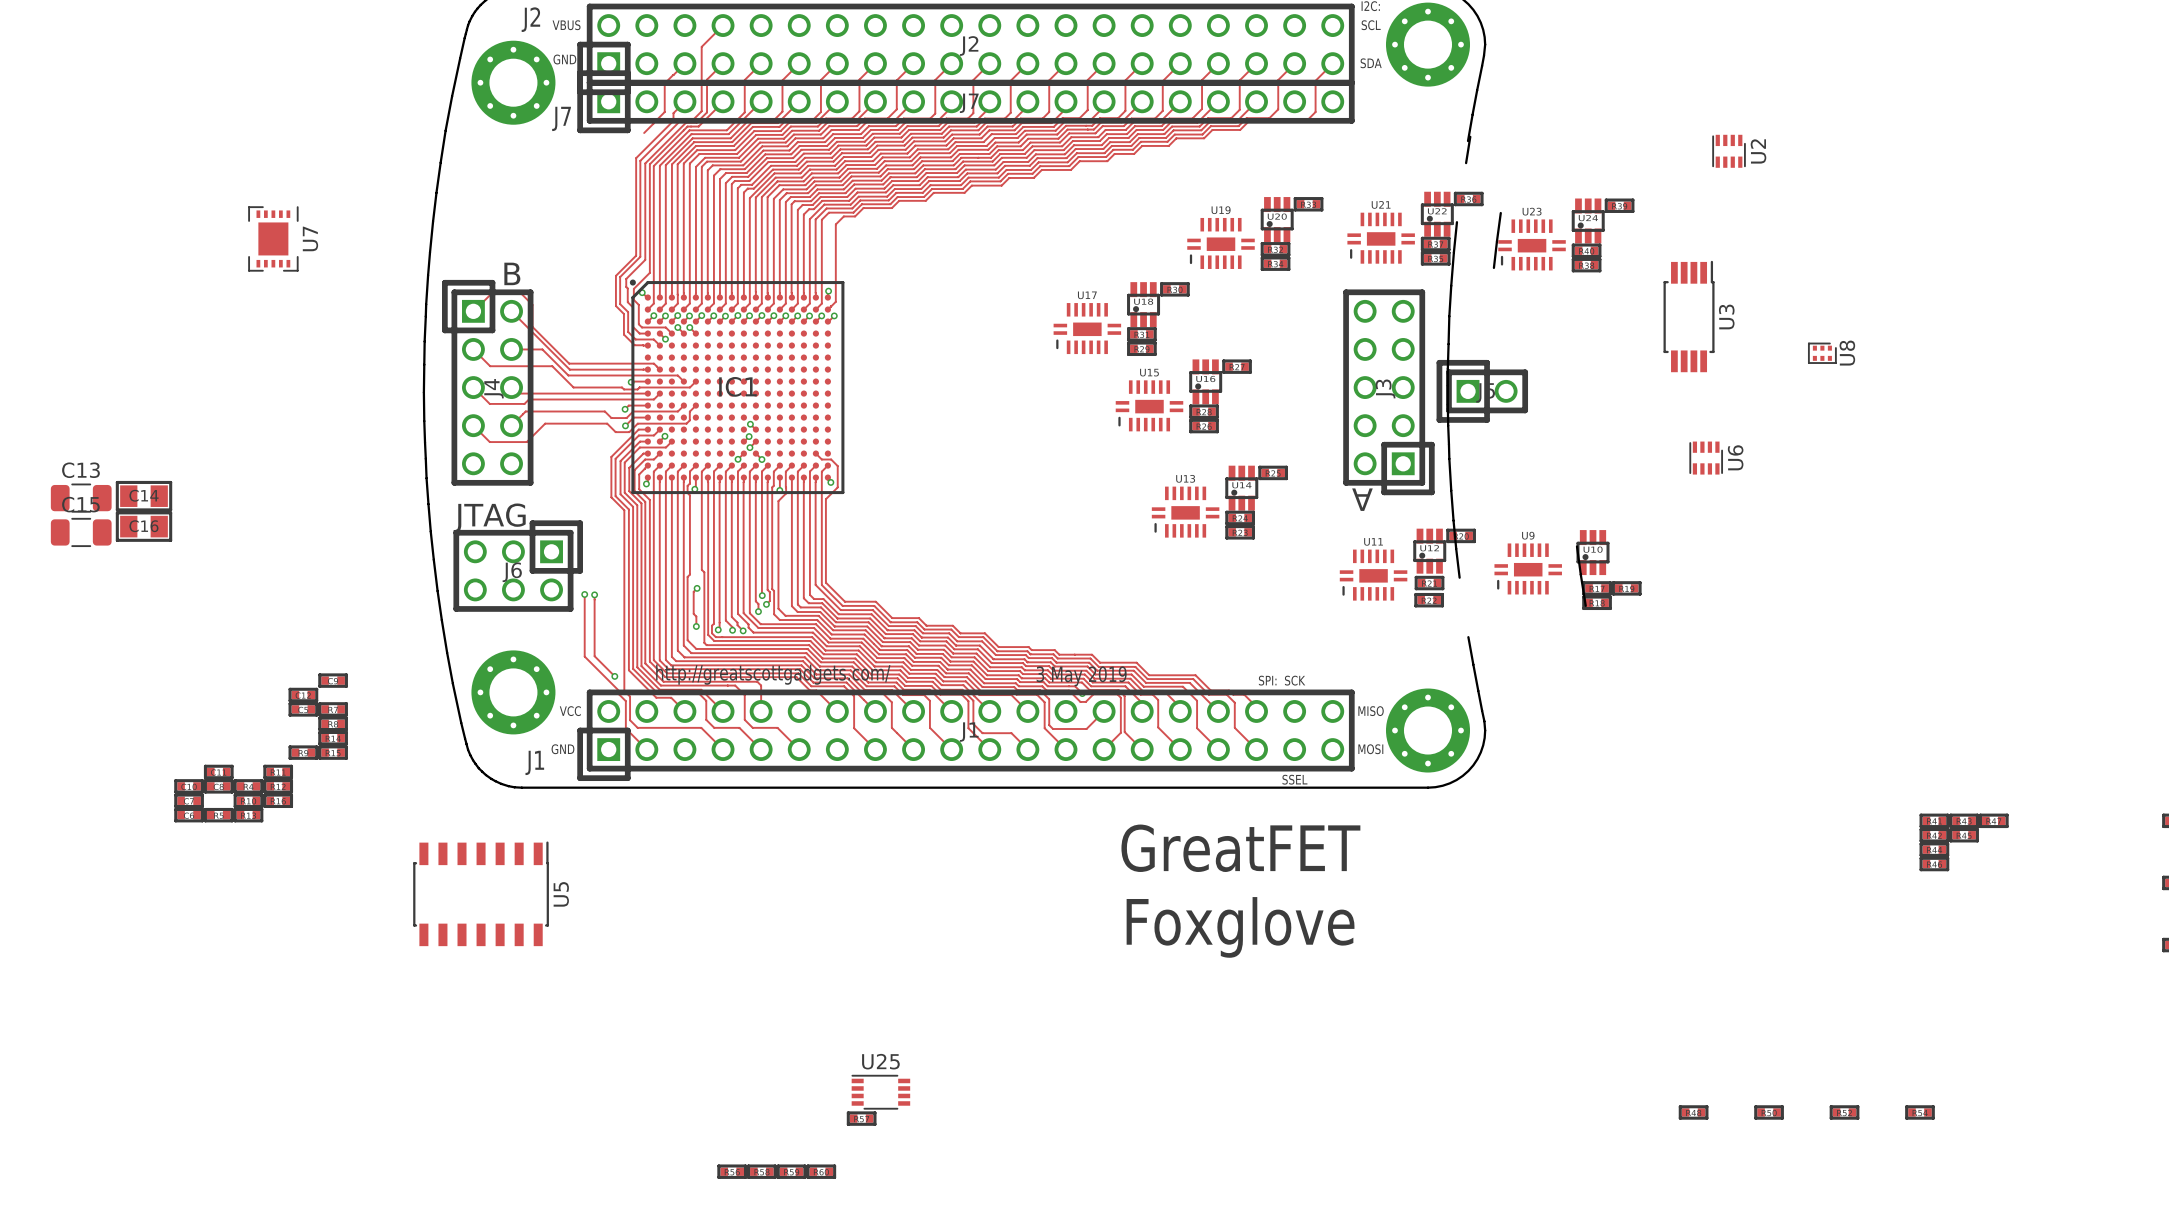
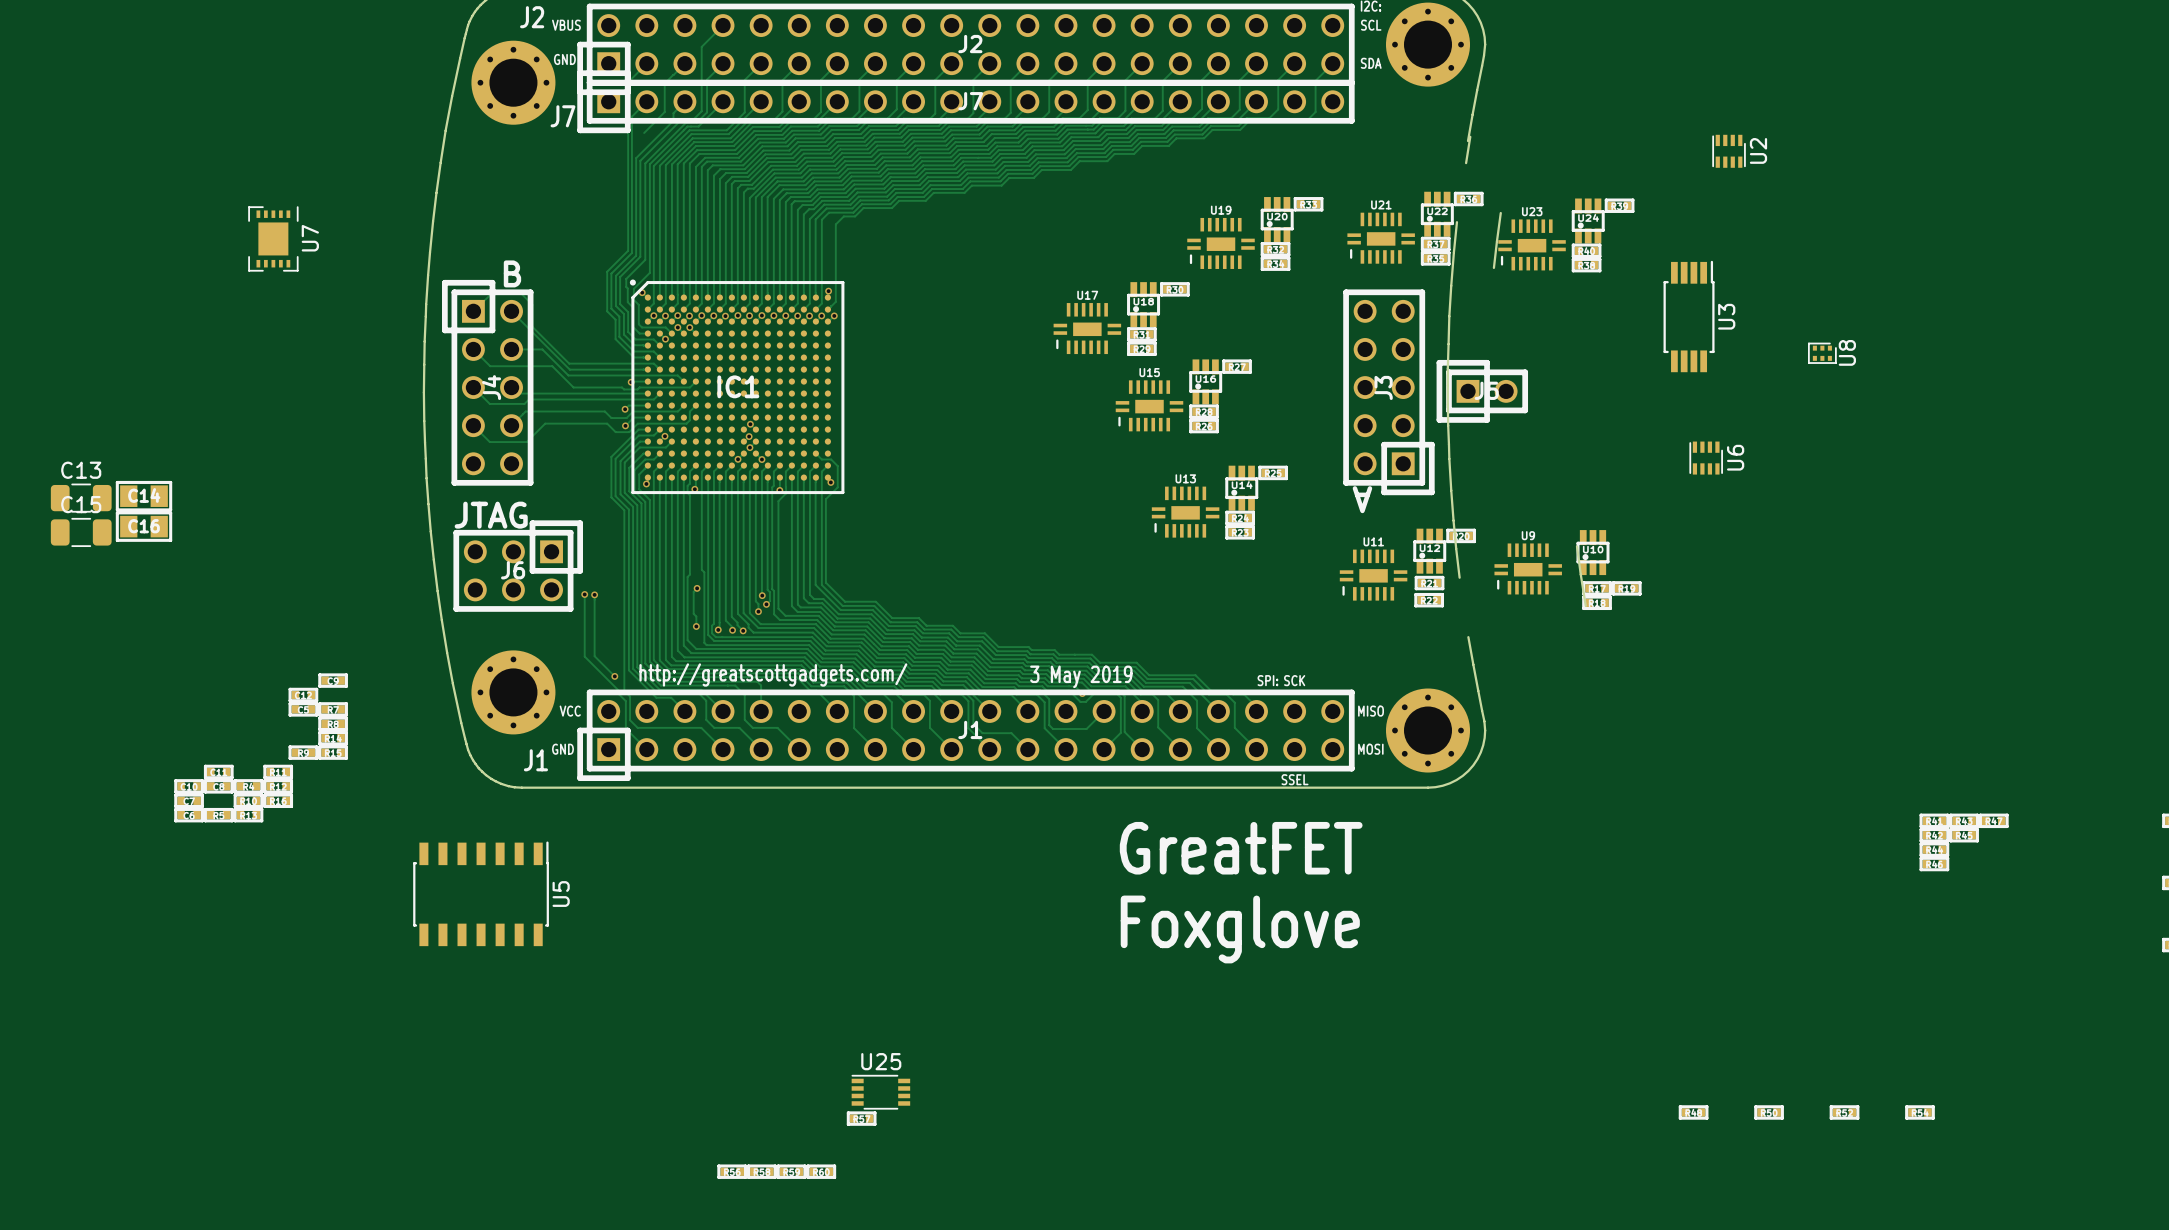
track: none -> (646, 63) (628, 82) (628, 250) (607, 271) (607, 311) (615, 319) (615, 339) (633, 357) (643, 357)
track: none -> (646, 101) (631, 116) (631, 253) (611, 273) (611, 308) (619, 316) (619, 336) (633, 351) (653, 351) (659, 357)

